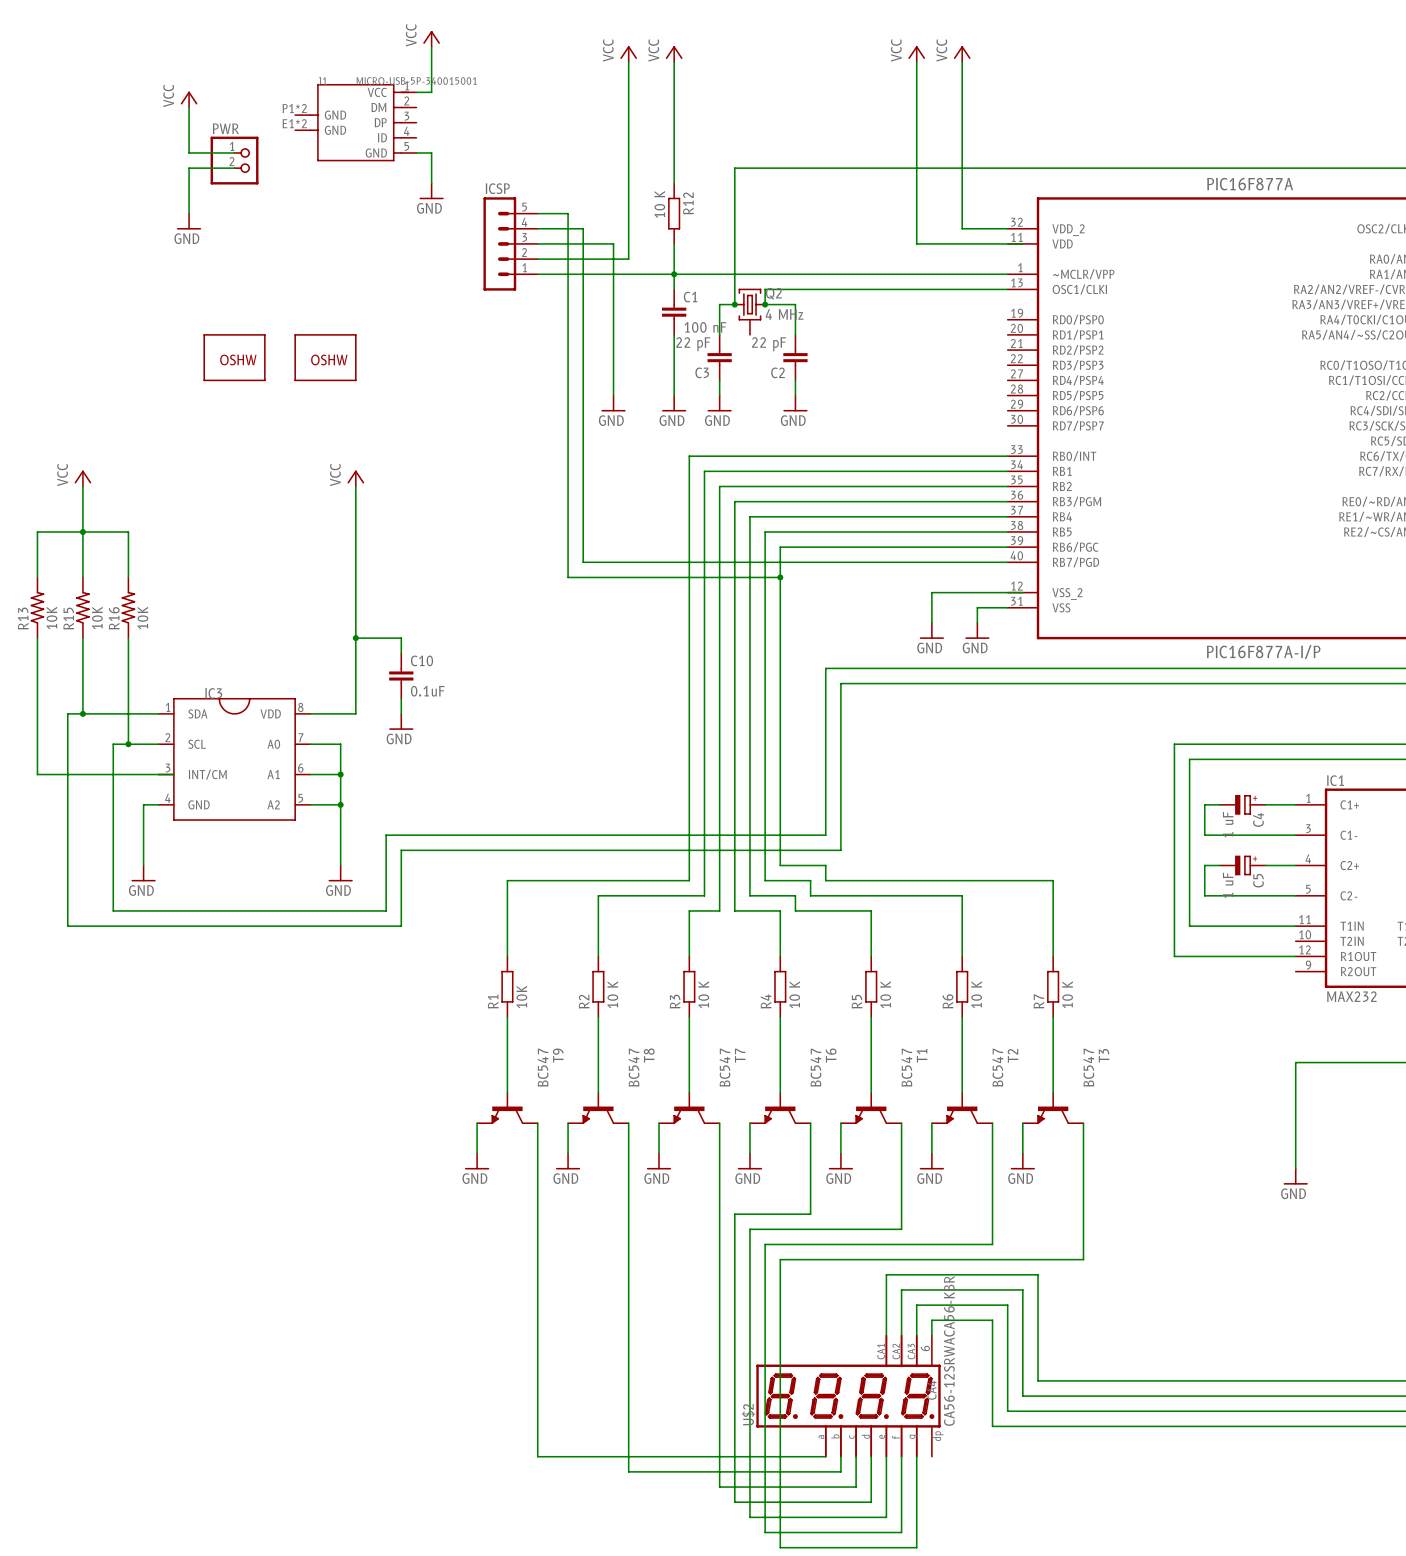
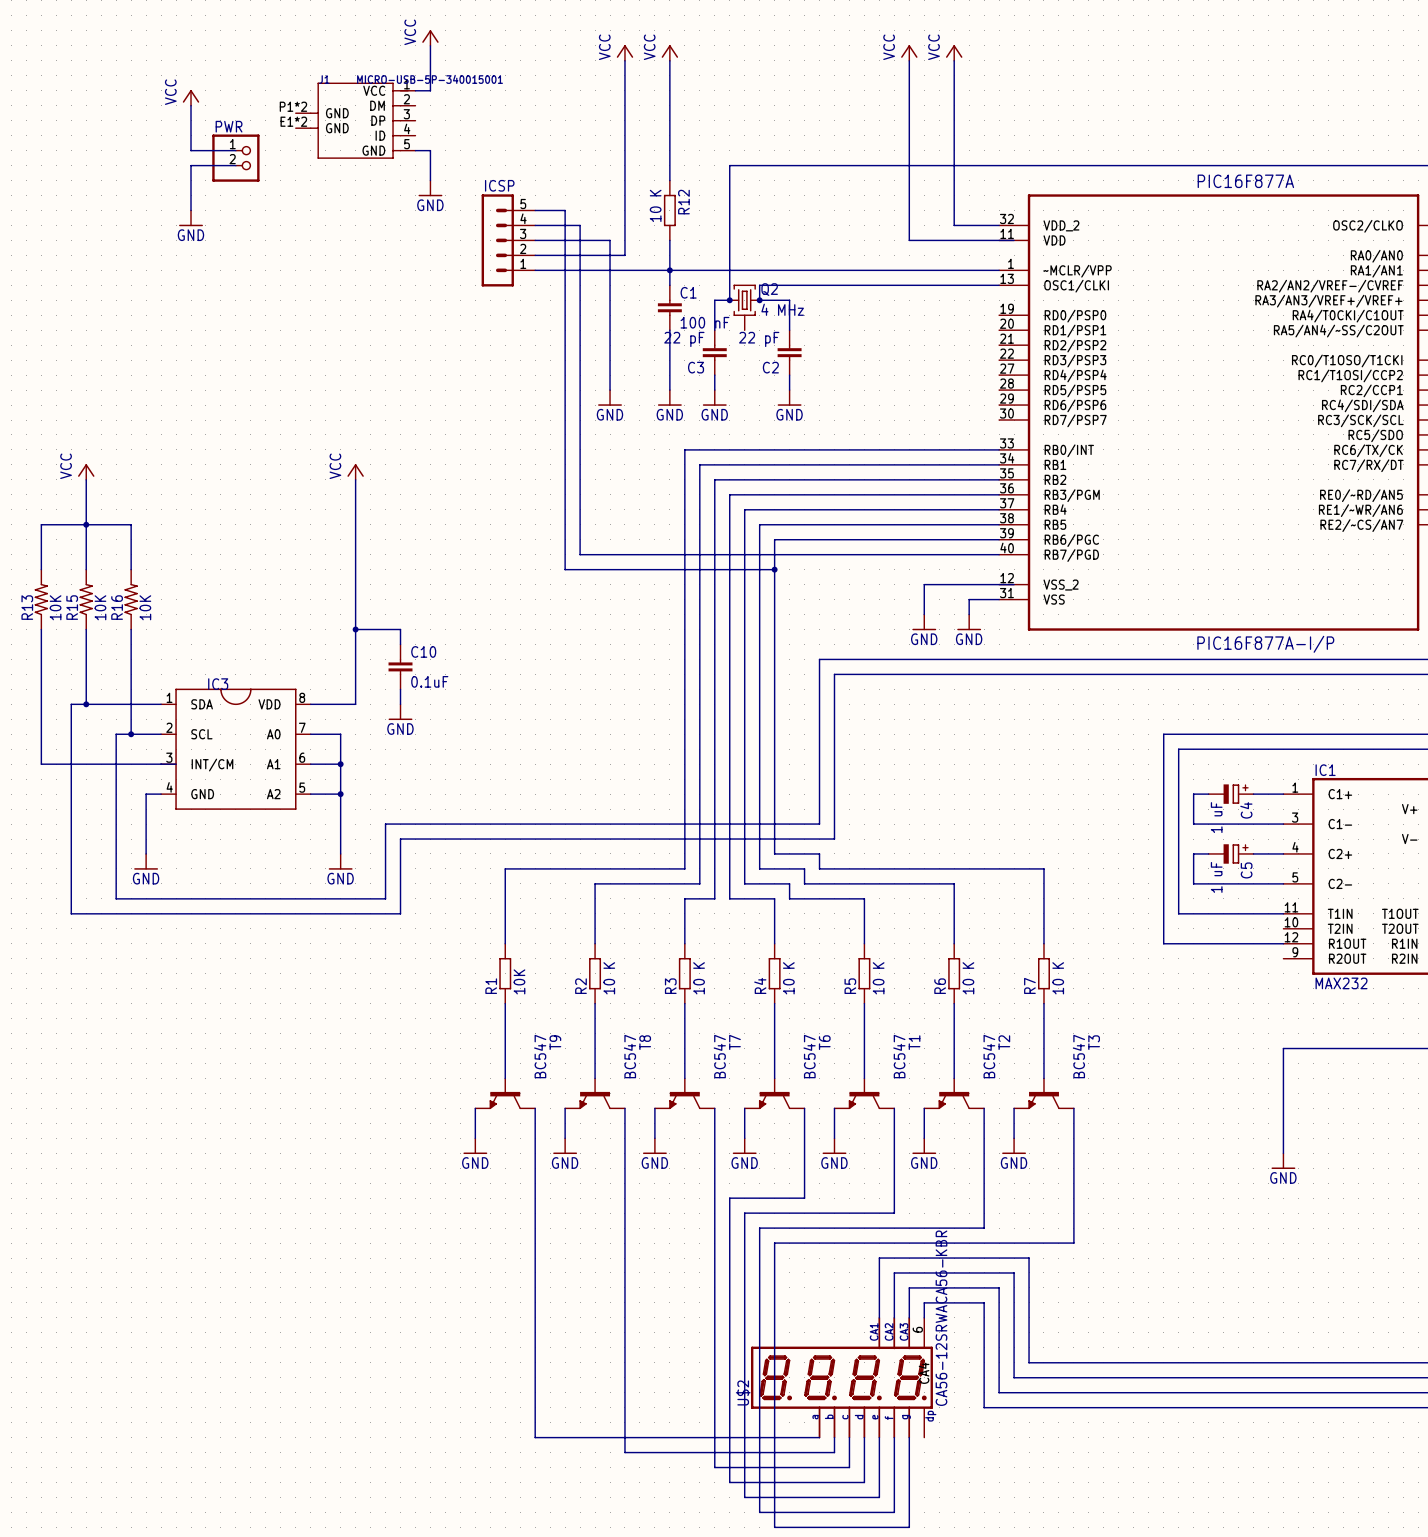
part: (234, 357) -> none
part: (325, 357) -> none

